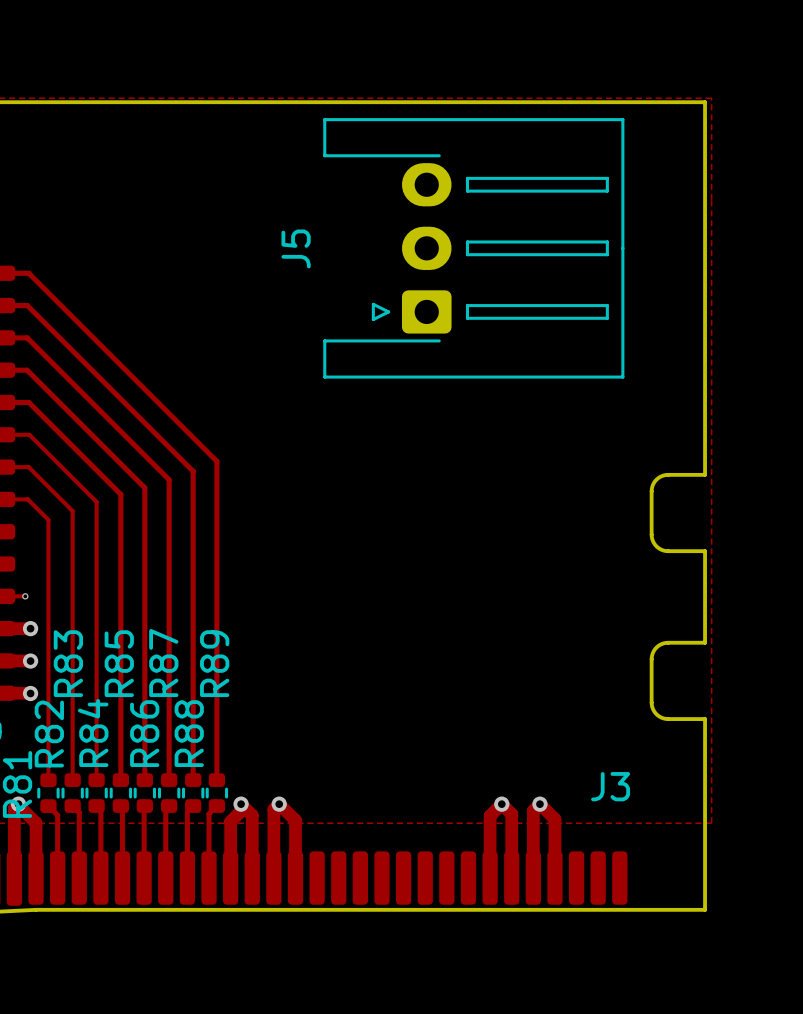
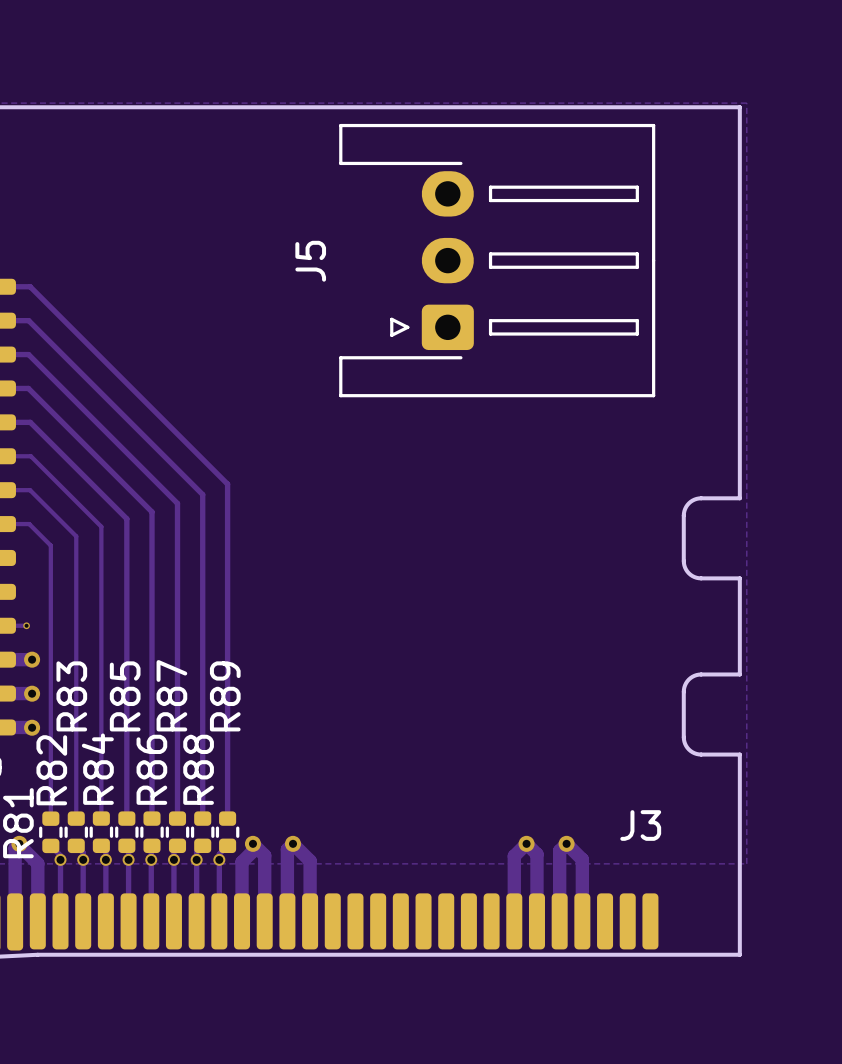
via: none -> (60, 859)
via: none -> (83, 859)
via: none -> (105, 859)
via: none -> (128, 859)
via: none -> (151, 859)
via: none -> (173, 859)
via: none -> (196, 859)
via: none -> (219, 859)

